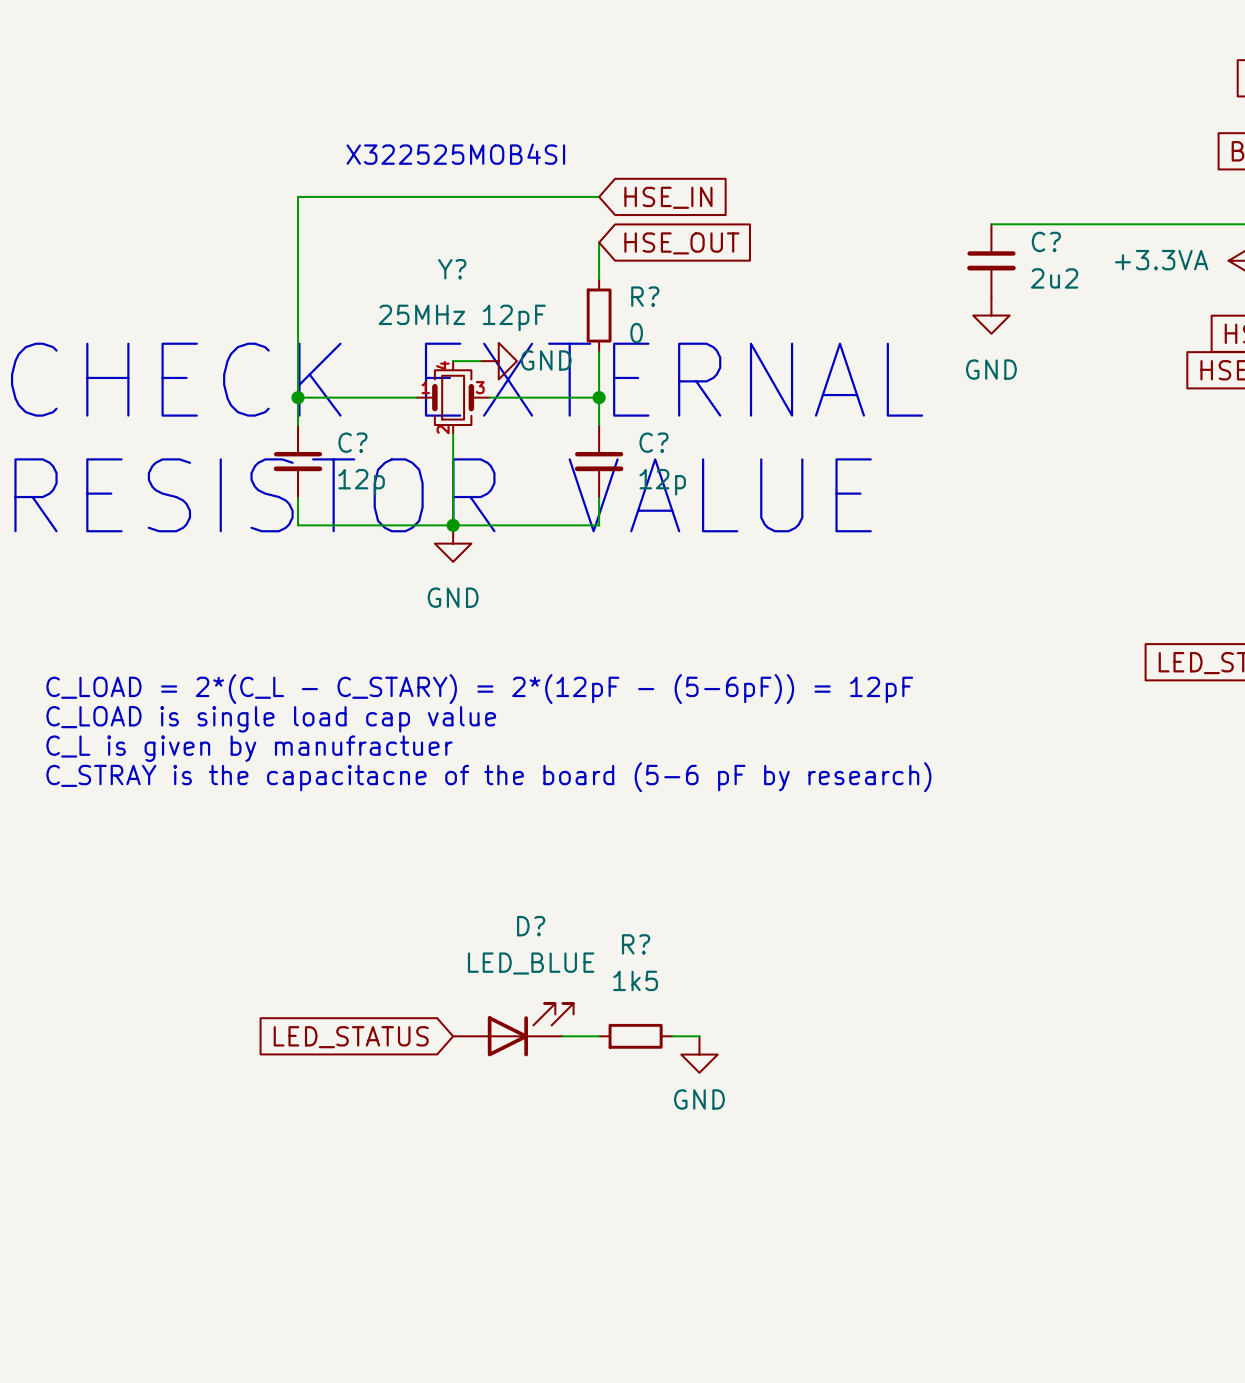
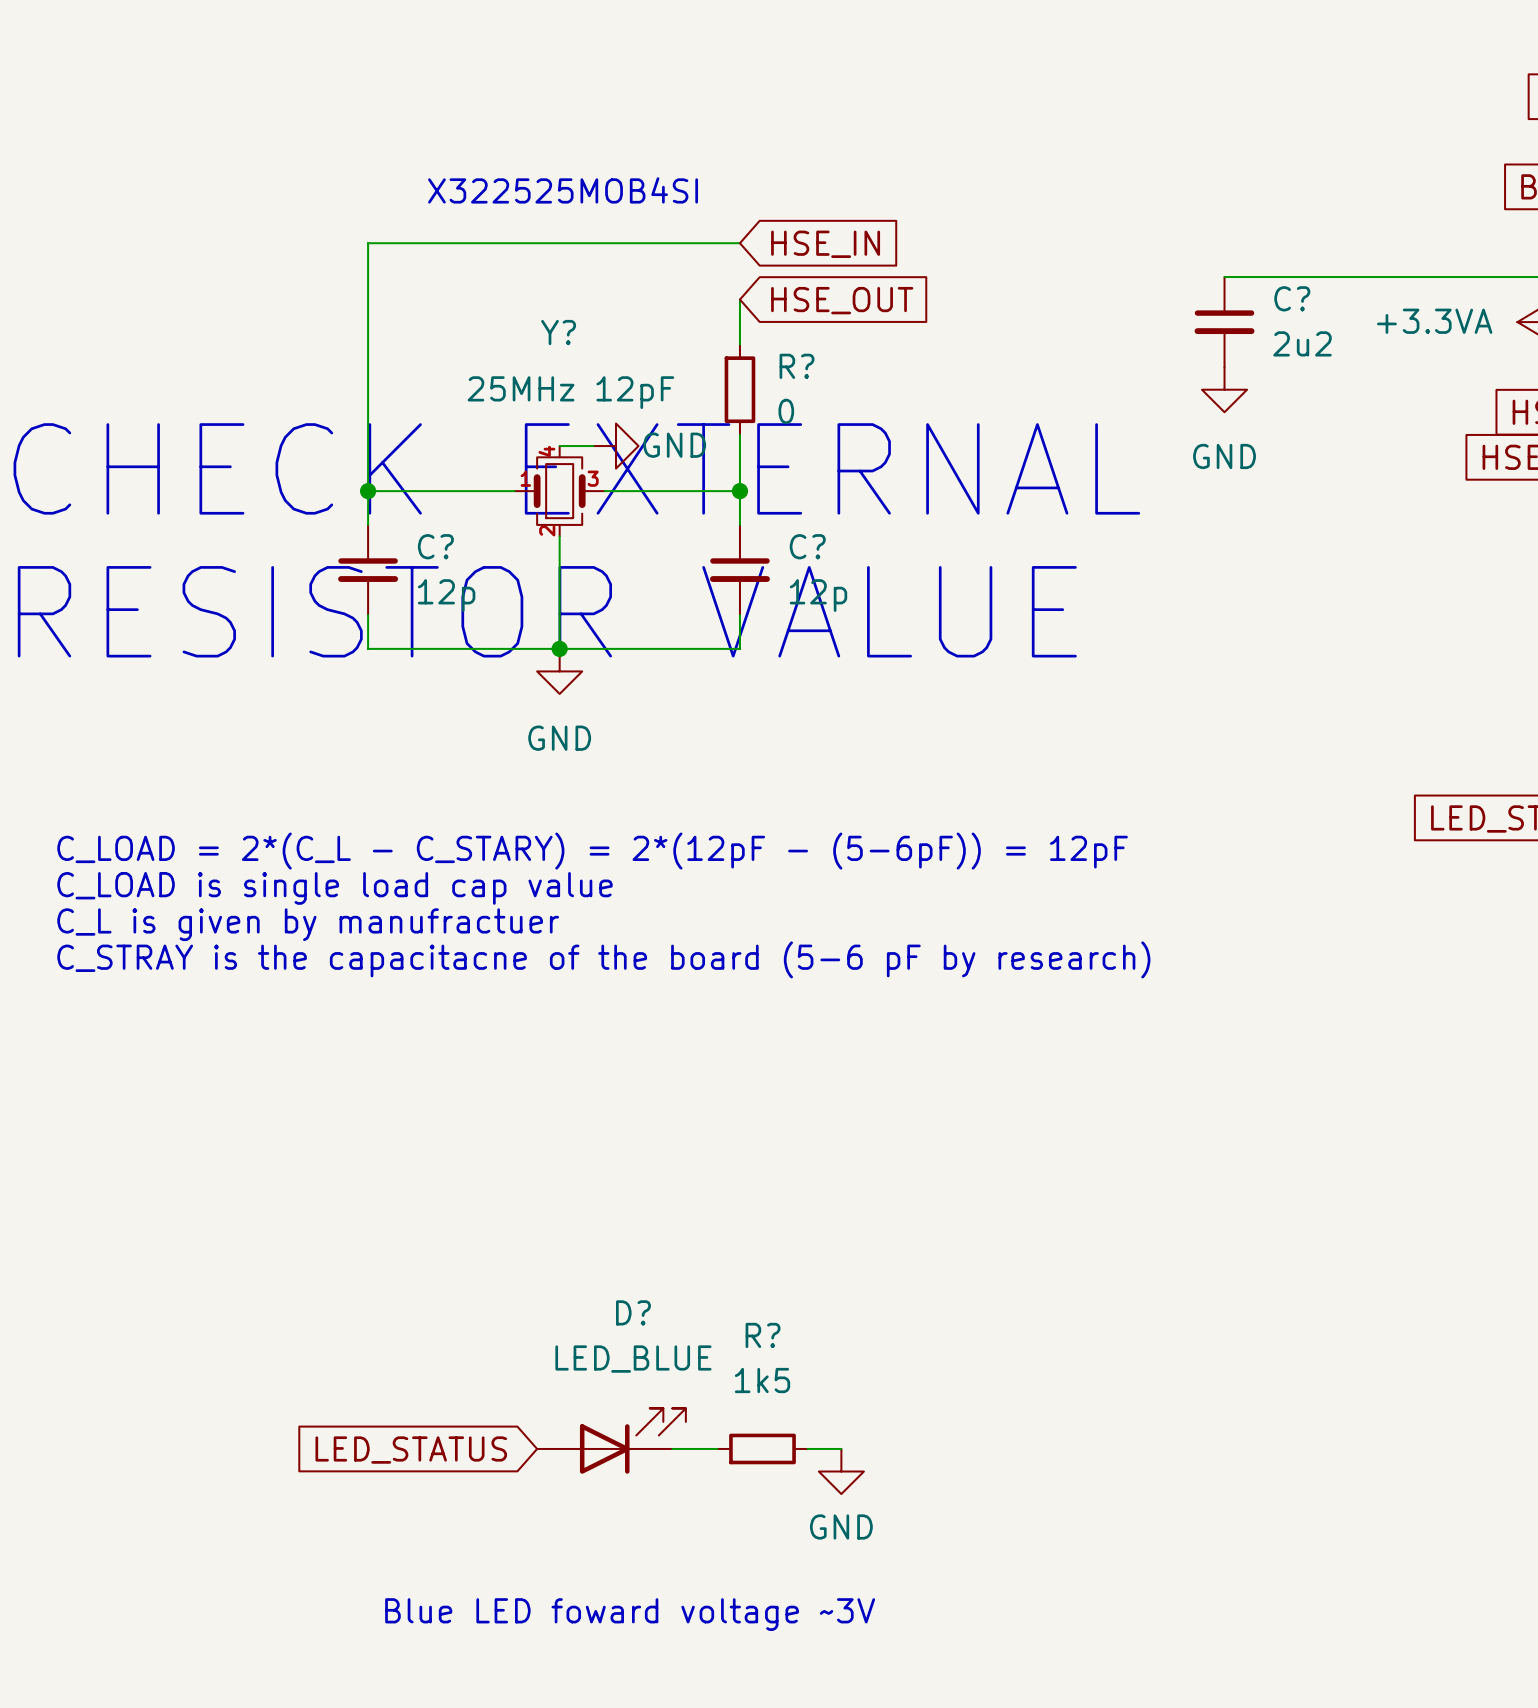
D? position: (513, 1029) -> (611, 1441)
wire: (562, 1036) (599, 1036) -> (672, 1448) (717, 1448)
R? position: (635, 1036) -> (762, 1448)
wire: (672, 1036) (699, 1036) -> (807, 1448) (841, 1448)
global label position: LED_STATUS (351, 1037) -> LED_STATUS (411, 1450)
power symbol position: GND (699, 1054) -> GND (841, 1471)
text: none -> Blue LED foward voltage ~3V (630, 1614)

